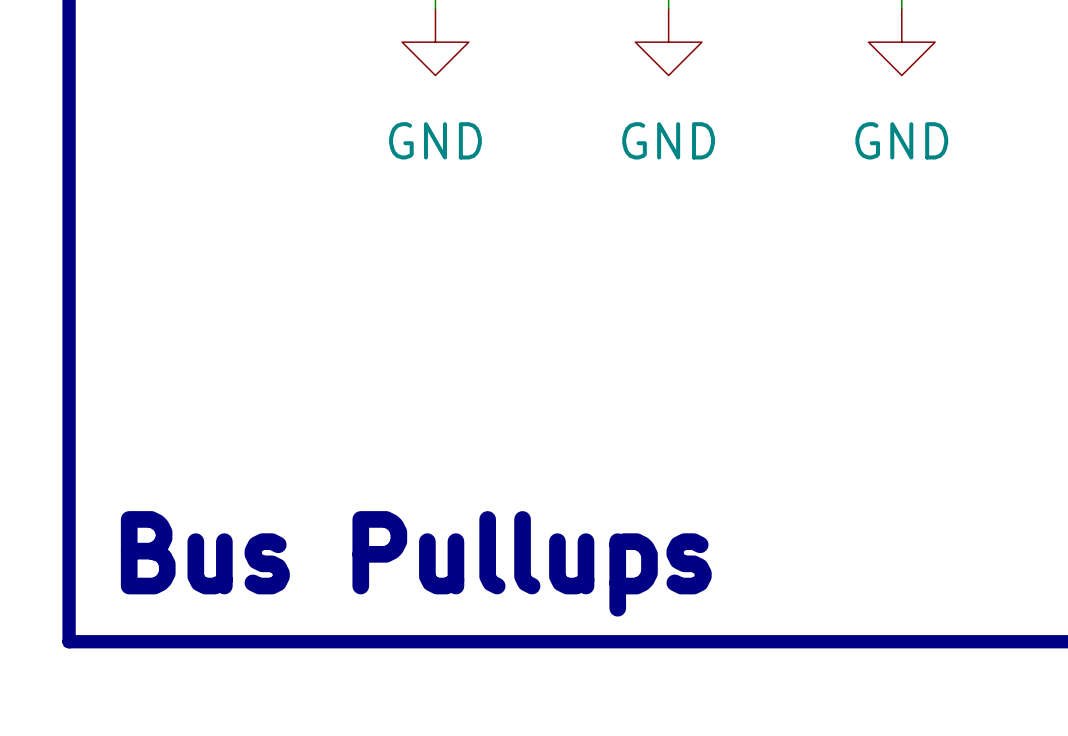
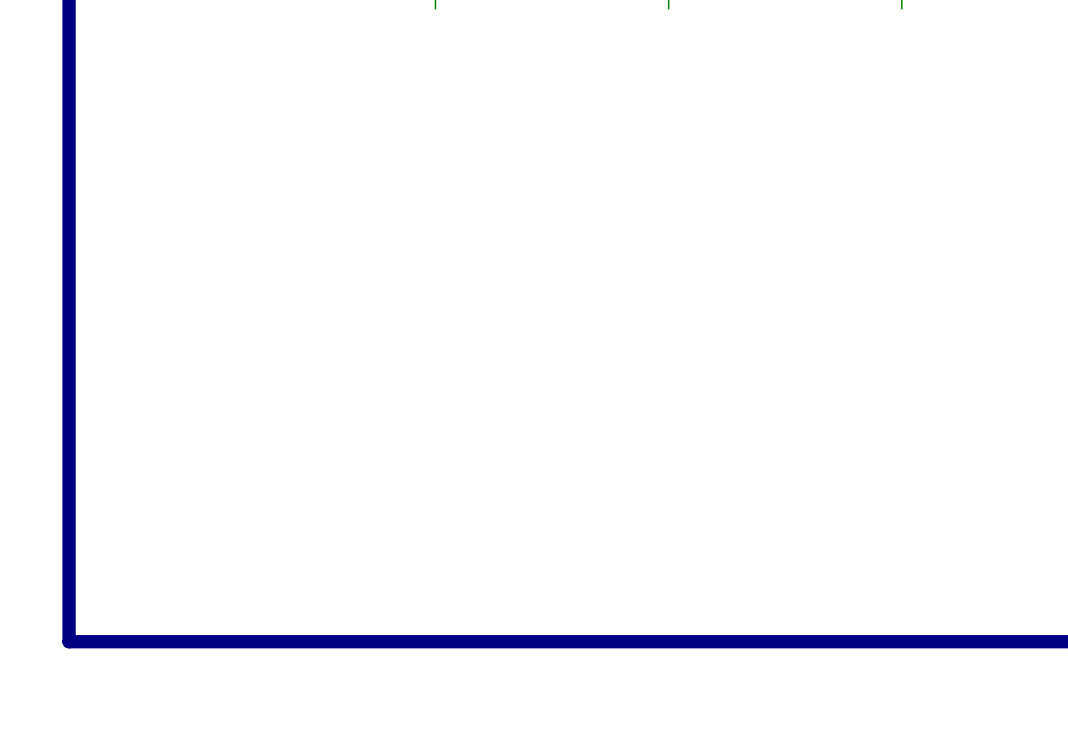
power symbol: GND (435, 42) -> none
power symbol: GND (668, 42) -> none
power symbol: GND (901, 42) -> none
text: Bus Pullups (416, 563) -> none

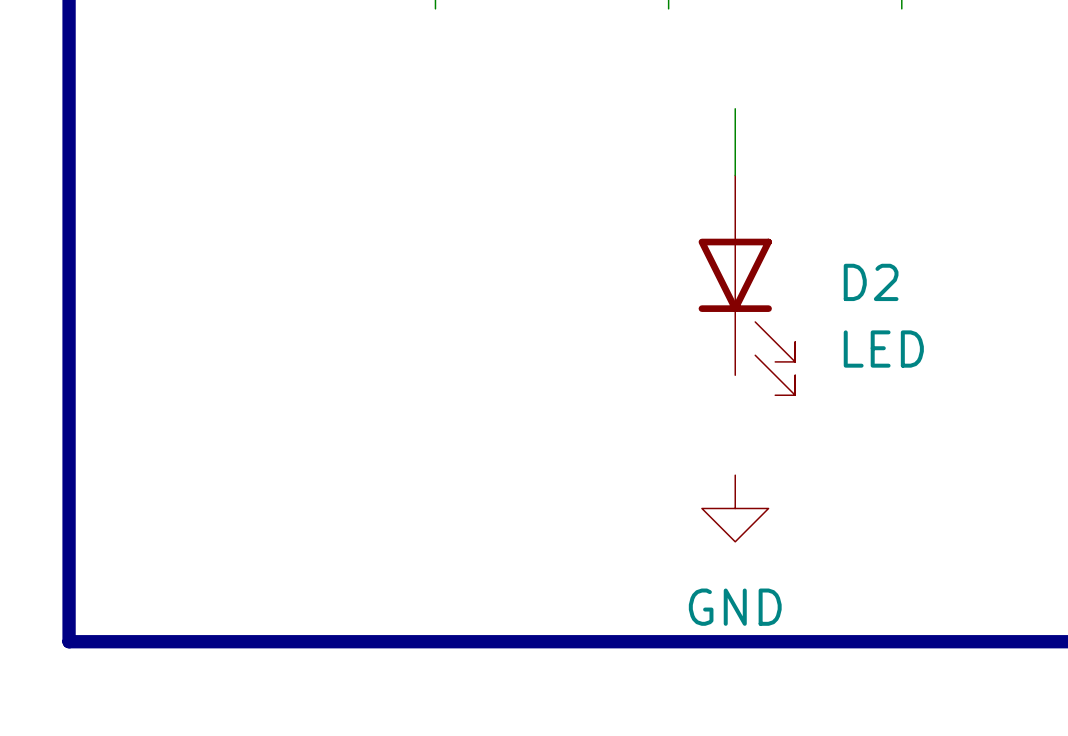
wire: none -> (735, 108) (735, 175)
D2: none -> LED (746, 285)
power symbol: none -> GND (735, 508)

